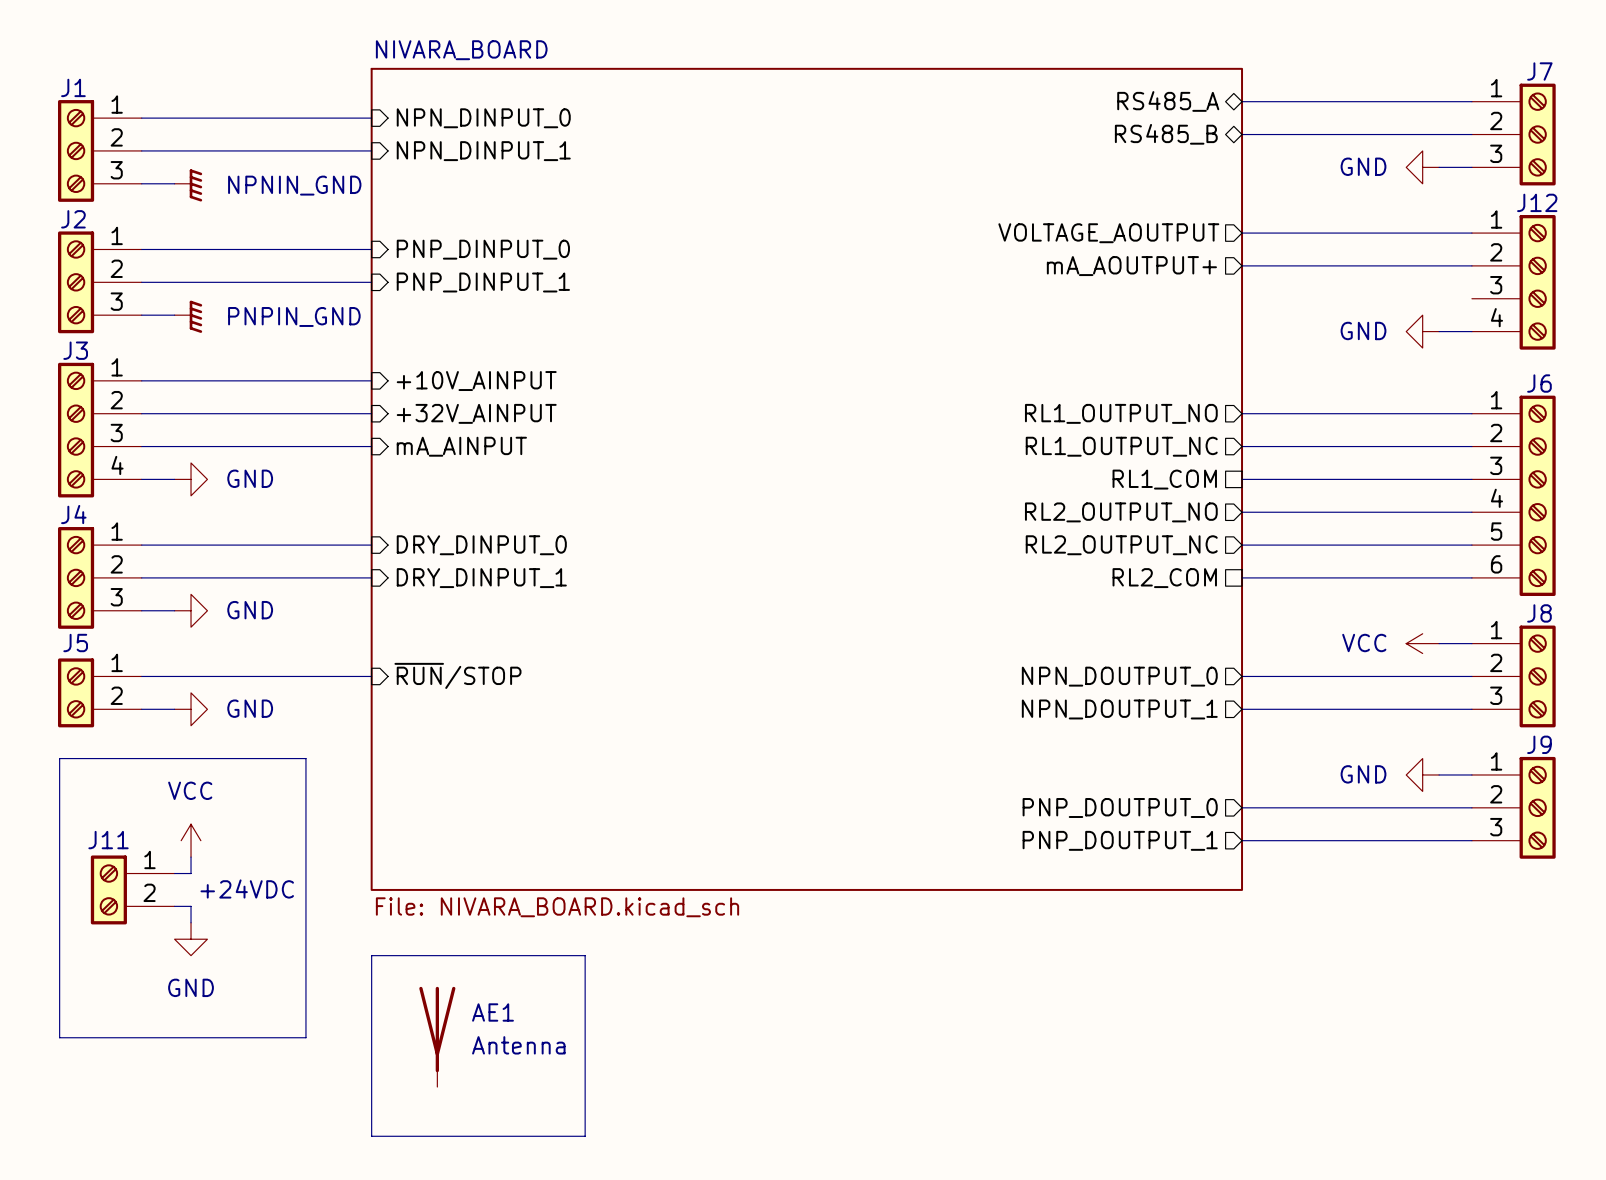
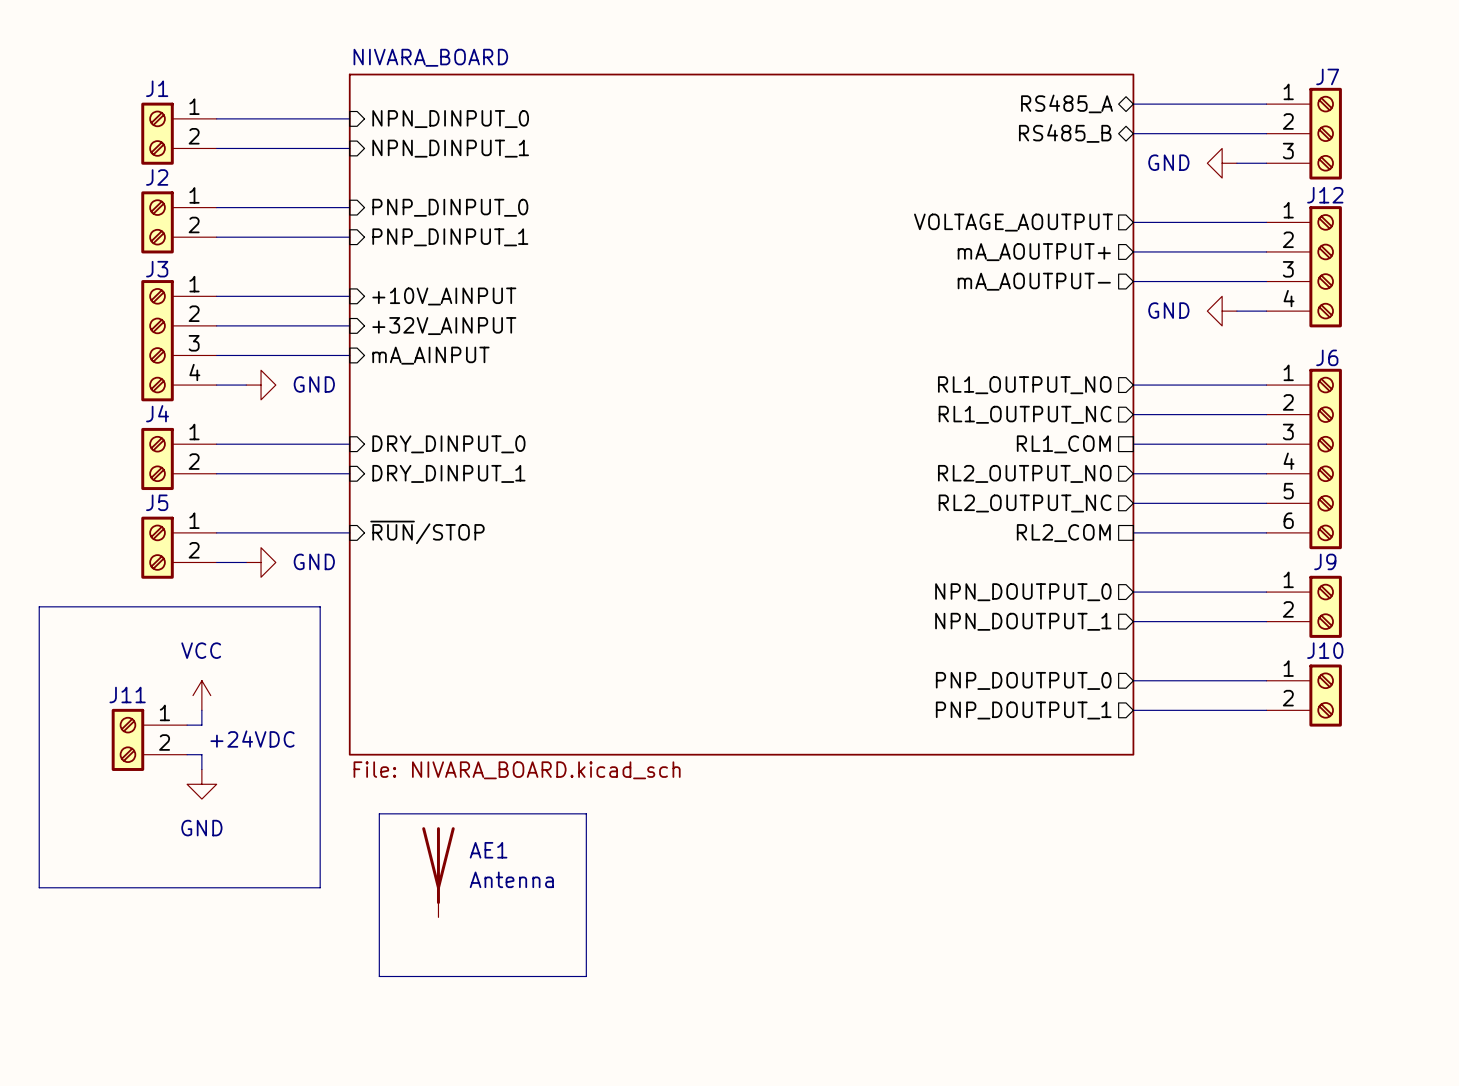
J1 symbol: [57, 100, 142, 202] -> [141, 102, 217, 165]
J7 position: (1513, 134) -> (1304, 133)
power symbol position: GND (1422, 167) -> GND (1222, 163)
wire: (141, 183) (174, 183) -> none
power symbol: NPNIN_GND (188, 185) -> none
wire: none -> (216, 207) (349, 207)
sheet pin: none -> PNP_DINPUT_0 (450, 207)
J2 symbol: [57, 231, 142, 334] -> [141, 191, 217, 254]
sheet pin: PNP_DINPUT_0 (483, 249) -> PNP_DINPUT_1 (450, 237)
wire: (141, 282) (371, 282) -> none
sheet pin: PNP_DINPUT_1 (483, 282) -> none
J12 position: (1513, 282) -> (1304, 266)
sheet pin: none -> mA_AOUTPUT- (1034, 281)
wire: none -> (1133, 281) (1266, 281)
wire: none -> (216, 296) (349, 296)
sheet pin: none -> +10V_AINPUT (444, 296)
power symbol: PNPIN_GND (188, 316) -> none
power symbol position: GND (1422, 331) -> GND (1222, 311)
wire: none -> (216, 325) (349, 325)
sheet pin: +10V_AINPUT (476, 381) -> mA_AINPUT (430, 355)
wire: (256, 413) (371, 413) -> none
power symbol: none -> GND (261, 385)
sheet pin position: +32V_AINPUT (476, 413) -> +32V_AINPUT (444, 326)
J3 position: (99, 430) -> (178, 340)
wire: (141, 446) (371, 446) -> none
sheet pin: mA_AINPUT (461, 446) -> none
sheet NIVARA_BOARD: none -> File: NIVARA_BOARD.kicad_sch (741, 414)
power symbol: GND (191, 479) -> none
wire: none -> (216, 444) (349, 444)
sheet NIVARA_BOARD: File: NIVARA_BOARD.kicad_sch (806, 479) -> none
J6 position: (1513, 495) -> (1304, 458)
wire: none -> (216, 473) (349, 473)
sheet pin: none -> DRY_DINPUT_1 (448, 473)
J4 symbol: [57, 527, 142, 629] -> [141, 427, 217, 491]
wire: (141, 545) (371, 545) -> none
sheet pin position: DRY_DINPUT_0 (481, 545) -> DRY_DINPUT_0 (448, 444)
sheet pin: DRY_DINPUT_1 (481, 578) -> ~{RUN}/STOP (427, 532)
power symbol: GND (191, 610) -> none
power symbol: none -> GND (261, 562)
sheet pin: none -> NPN_DOUTPUT_0 (1023, 592)
wire: none -> (1133, 592) (1266, 592)
power symbol: VCC (1422, 643) -> none
line: none -> (39, 606) (320, 606) (320, 887) (39, 887) (39, 606)
sheet pin: ~{RUN}/STOP (457, 675) -> none
wire: (141, 676) (371, 676) -> none
sheet pin: NPN_DOUTPUT_0 (1119, 676) -> NPN_DOUTPUT_1 (1023, 621)
J8: (1513, 676) -> none
J5 position: (99, 692) -> (178, 547)
wire: (141, 709) (174, 709) -> none
power symbol: GND (191, 709) -> none
sheet pin: NPN_DOUTPUT_1 (1119, 709) -> none
wire: (1242, 709) (1471, 709) -> none
wire: none -> (1133, 680) (1266, 680)
J9 symbol: [1471, 756, 1556, 859] -> [1266, 575, 1342, 638]
line: (59, 758) (305, 758) (305, 1037) (59, 1037) (59, 758) -> none
J10: none -> (1304, 695)
wire: none -> (1133, 710) (1266, 710)
power symbol: GND (1422, 774) -> none
wire: (1242, 807) (1471, 807) -> none
sheet pin position: PNP_DOUTPUT_0 (1120, 808) -> PNP_DOUTPUT_0 (1023, 680)
power symbol position: VCC (191, 840) -> VCC (201, 695)
sheet pin position: PNP_DOUTPUT_1 (1120, 840) -> PNP_DOUTPUT_1 (1023, 710)
wire: (1242, 840) (1471, 840) -> none
wire: (191, 857) (191, 873) (174, 873) -> (201, 710) (201, 725) (187, 725)
power symbol: none -> GND (201, 784)
text position: +24VDC (247, 888) -> +24VDC (252, 739)
J11 position: (132, 889) -> (149, 739)
line: none -> (379, 813) (586, 813) (586, 976) (379, 976) (379, 813)
wire: (174, 906) (191, 906) (191, 922) -> (187, 754) (201, 754) (201, 769)
power symbol: GND (191, 939) -> none
line: (371, 955) (585, 955) (585, 1136) (371, 1136) (371, 955) -> none
AE1 position: (437, 1036) -> (438, 872)

